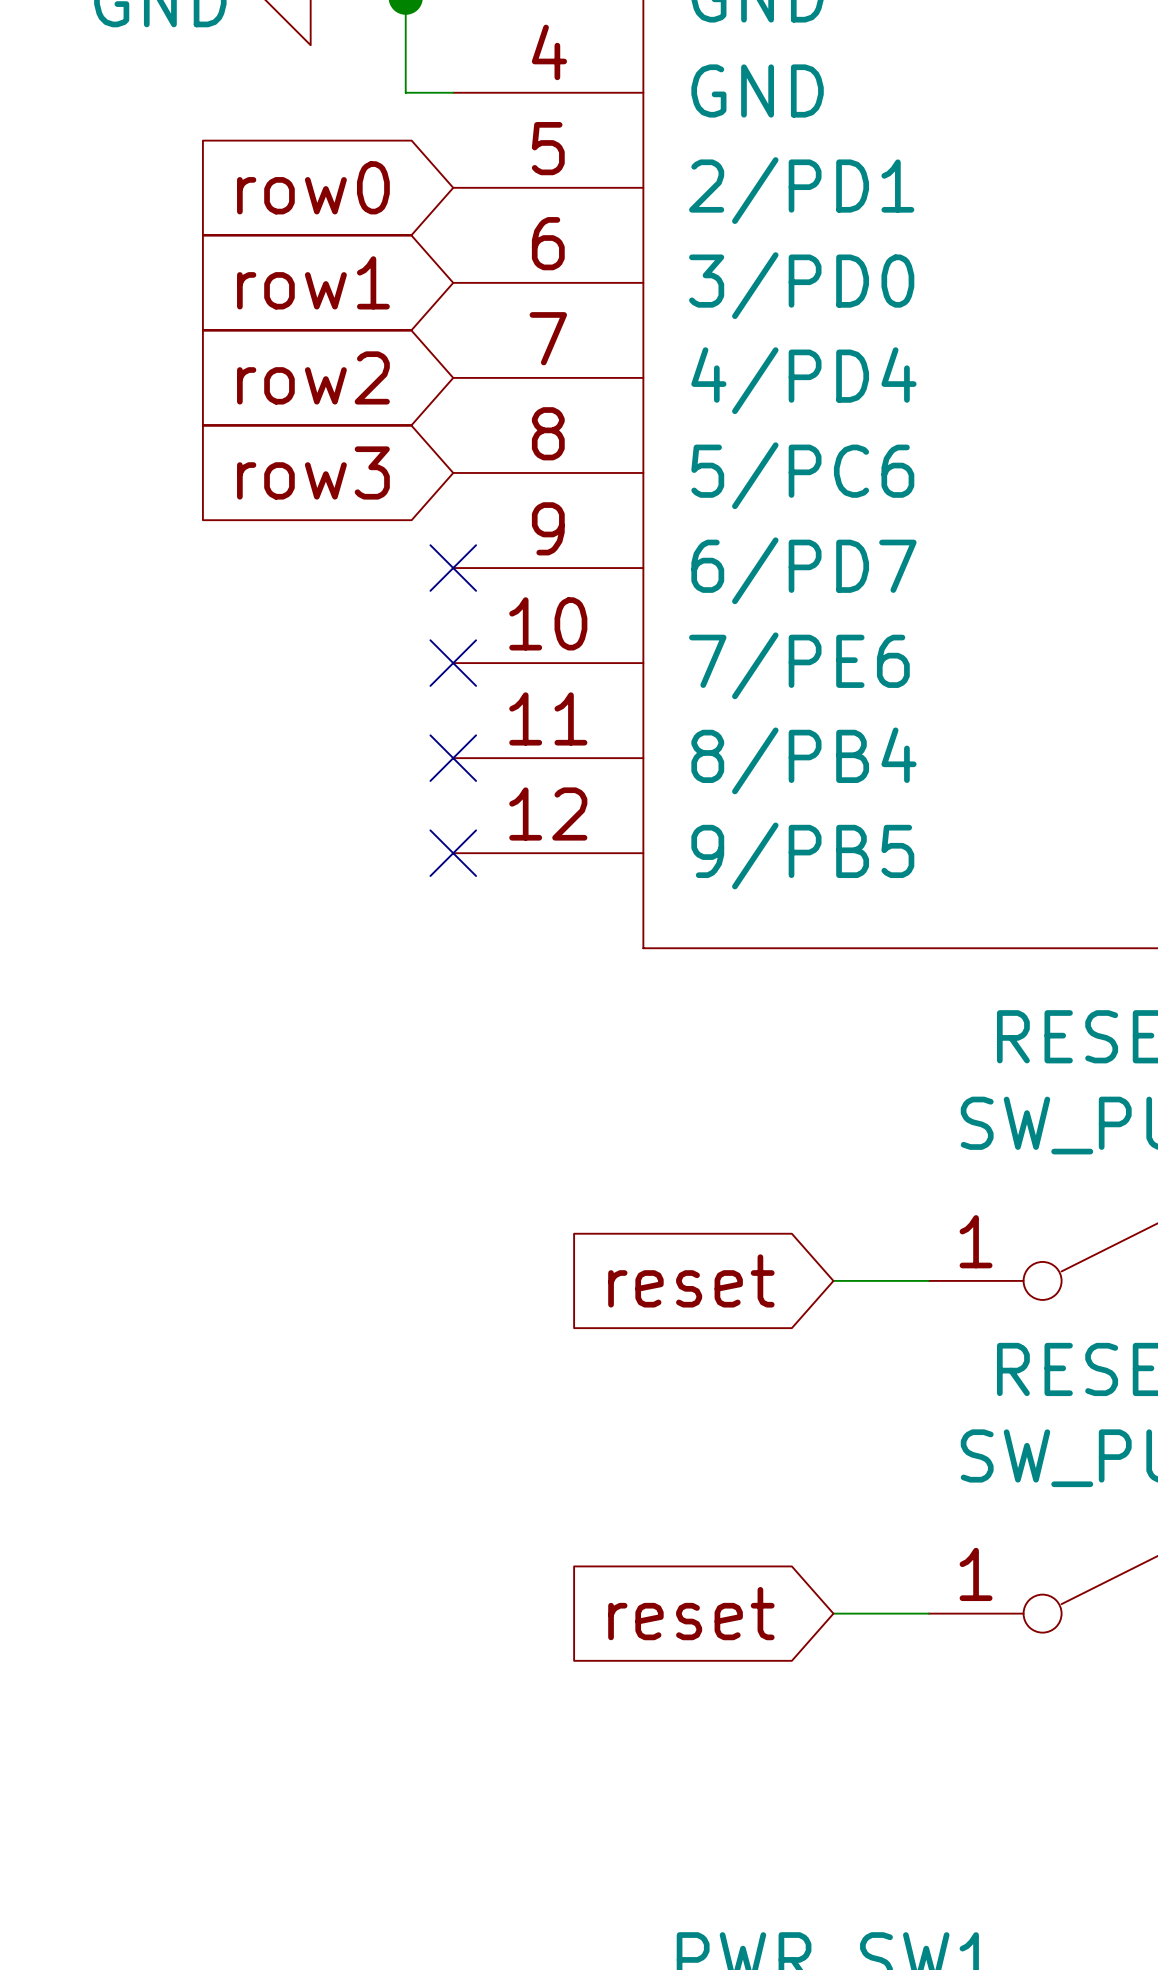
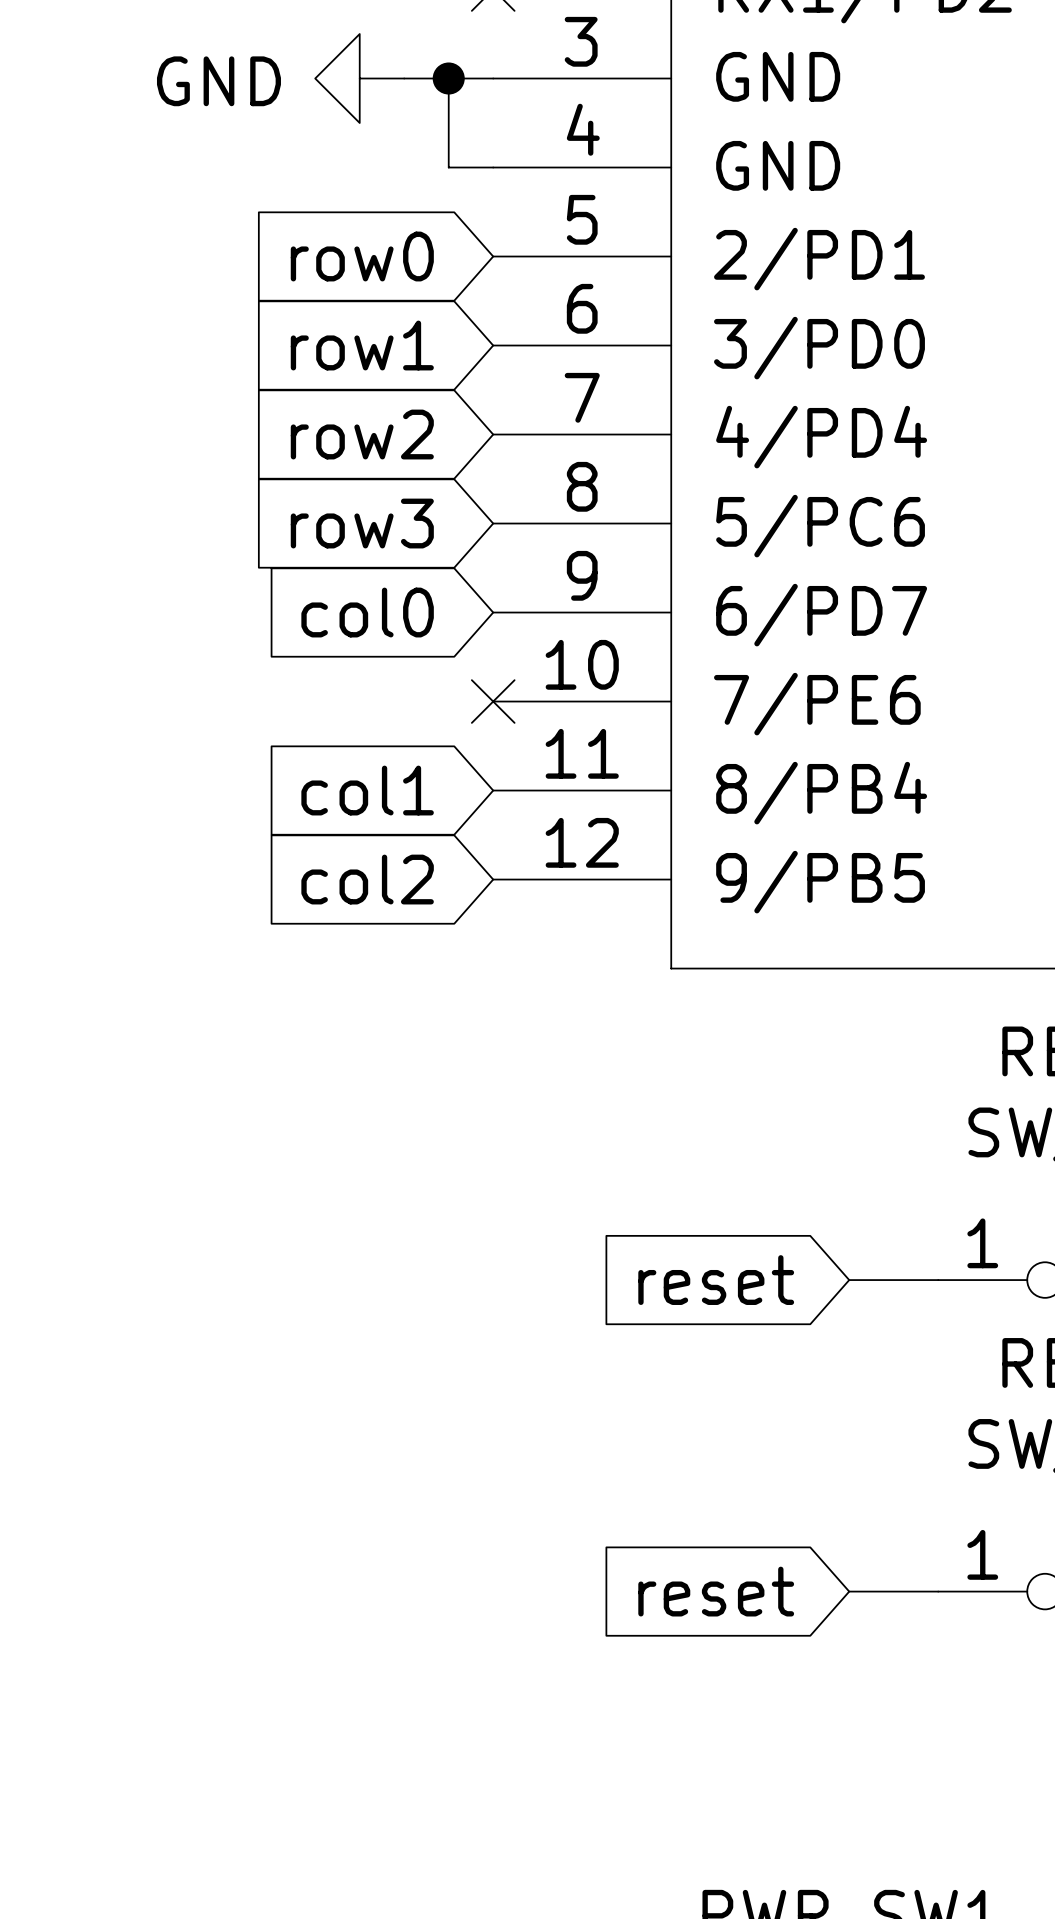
global label: none -> col0 (367, 612)
no-connect mark: (453, 568) -> none
global label: none -> col1 (367, 790)
no-connect mark: (453, 758) -> none
global label: none -> col2 (367, 879)
no-connect mark: (453, 853) -> none

